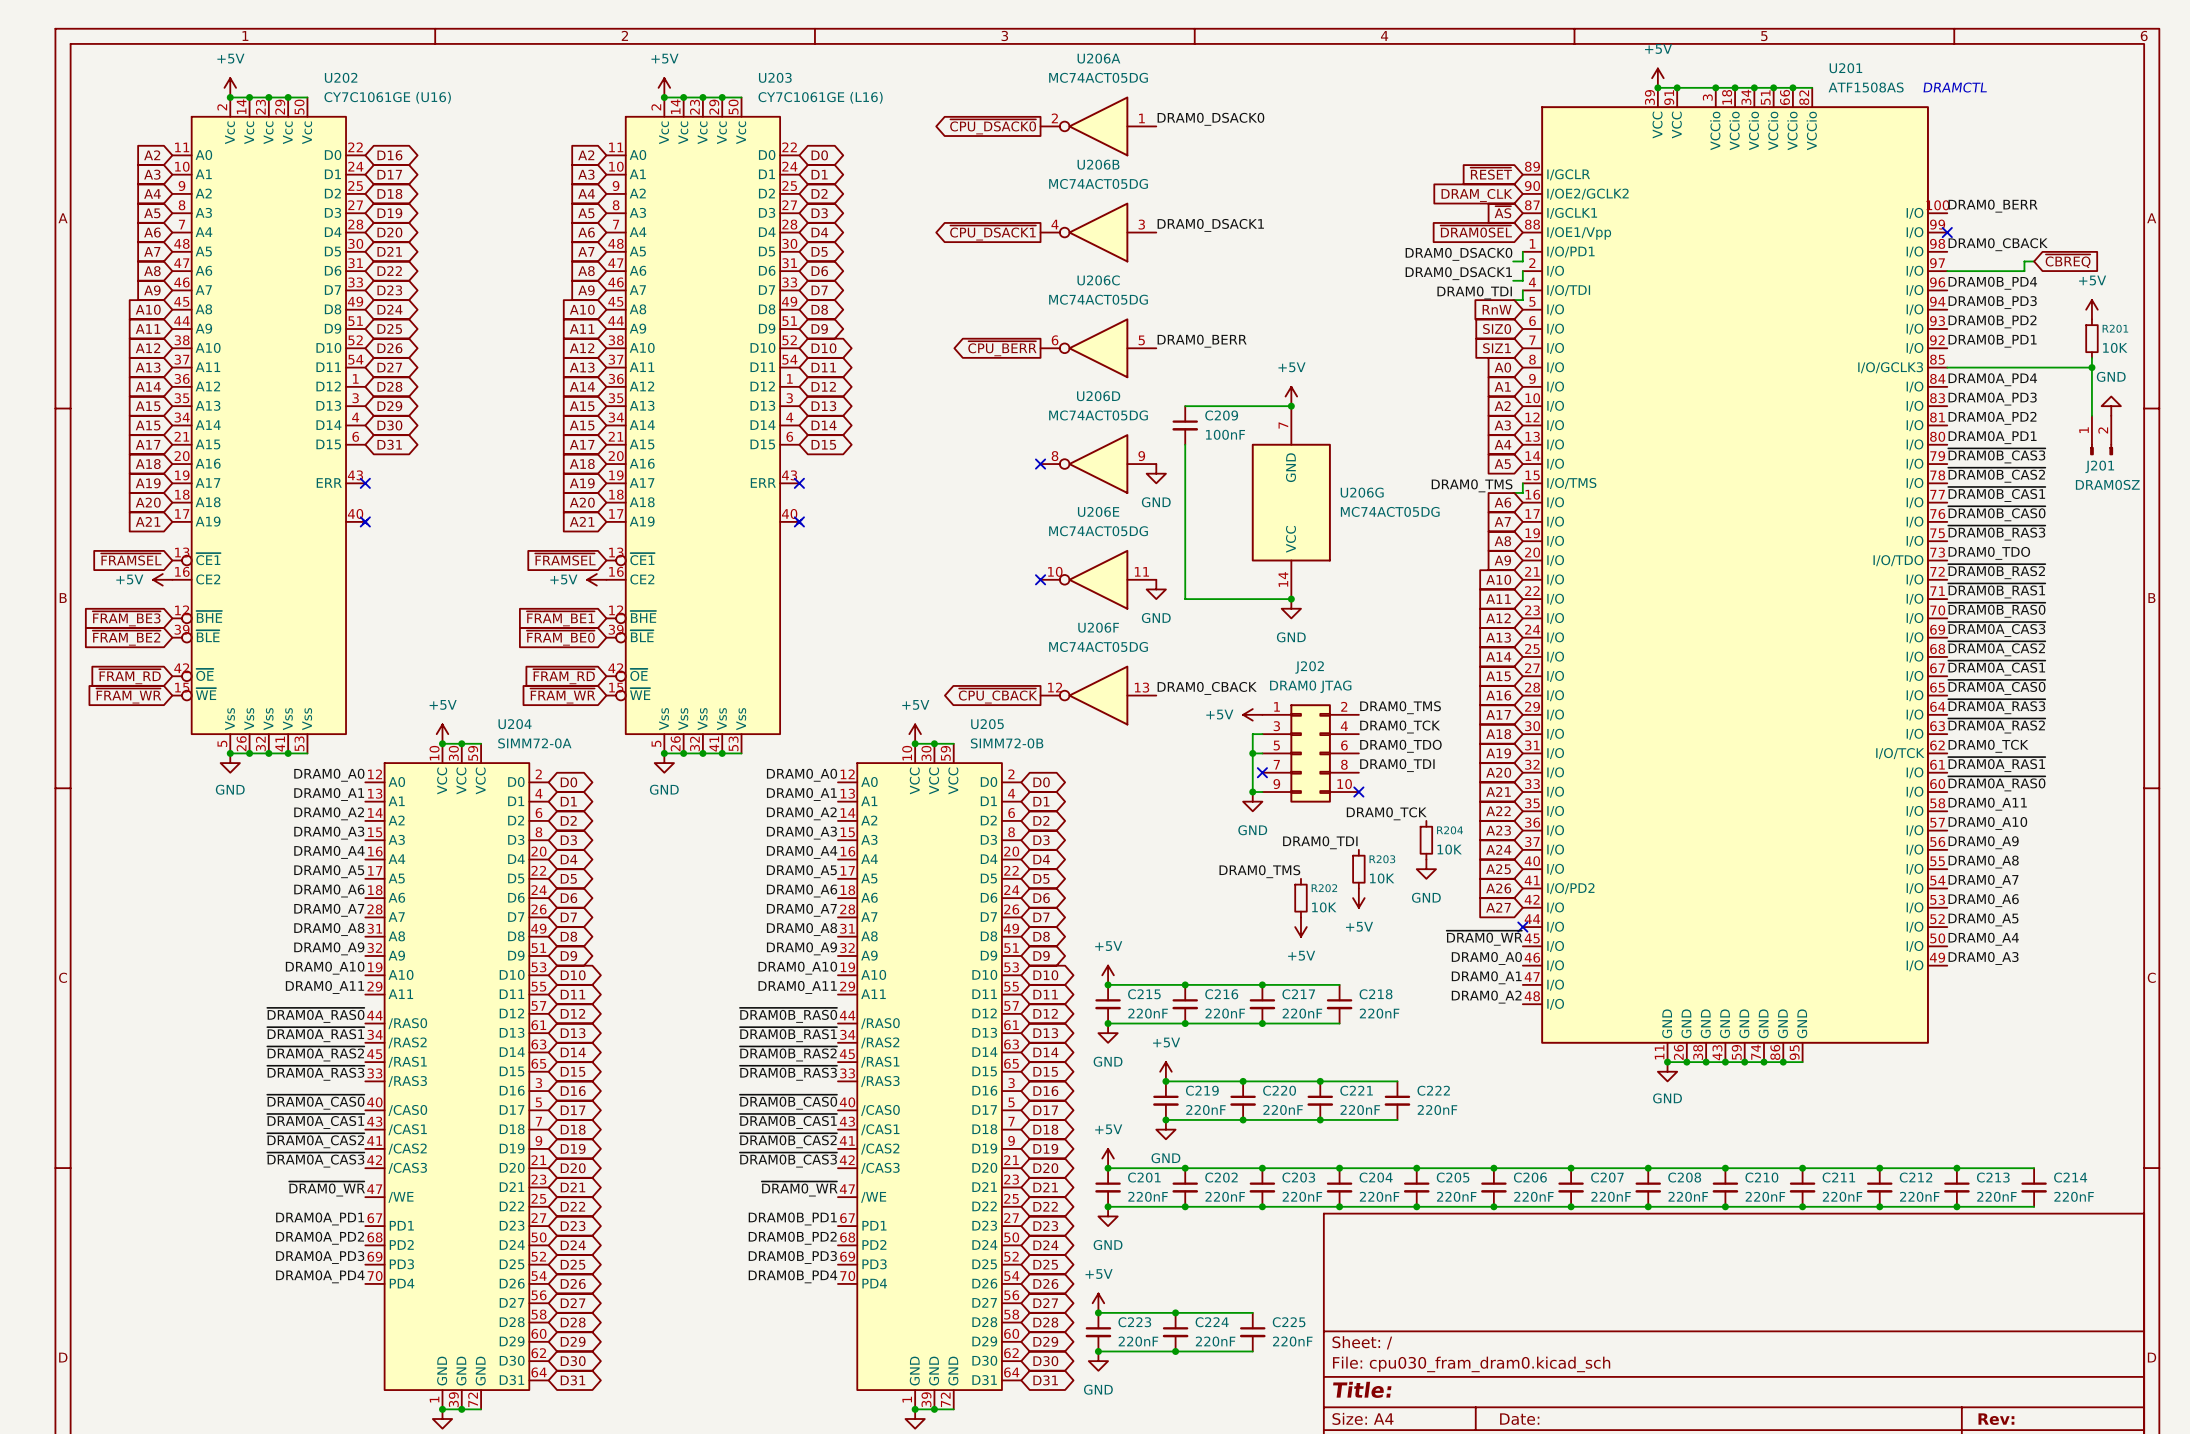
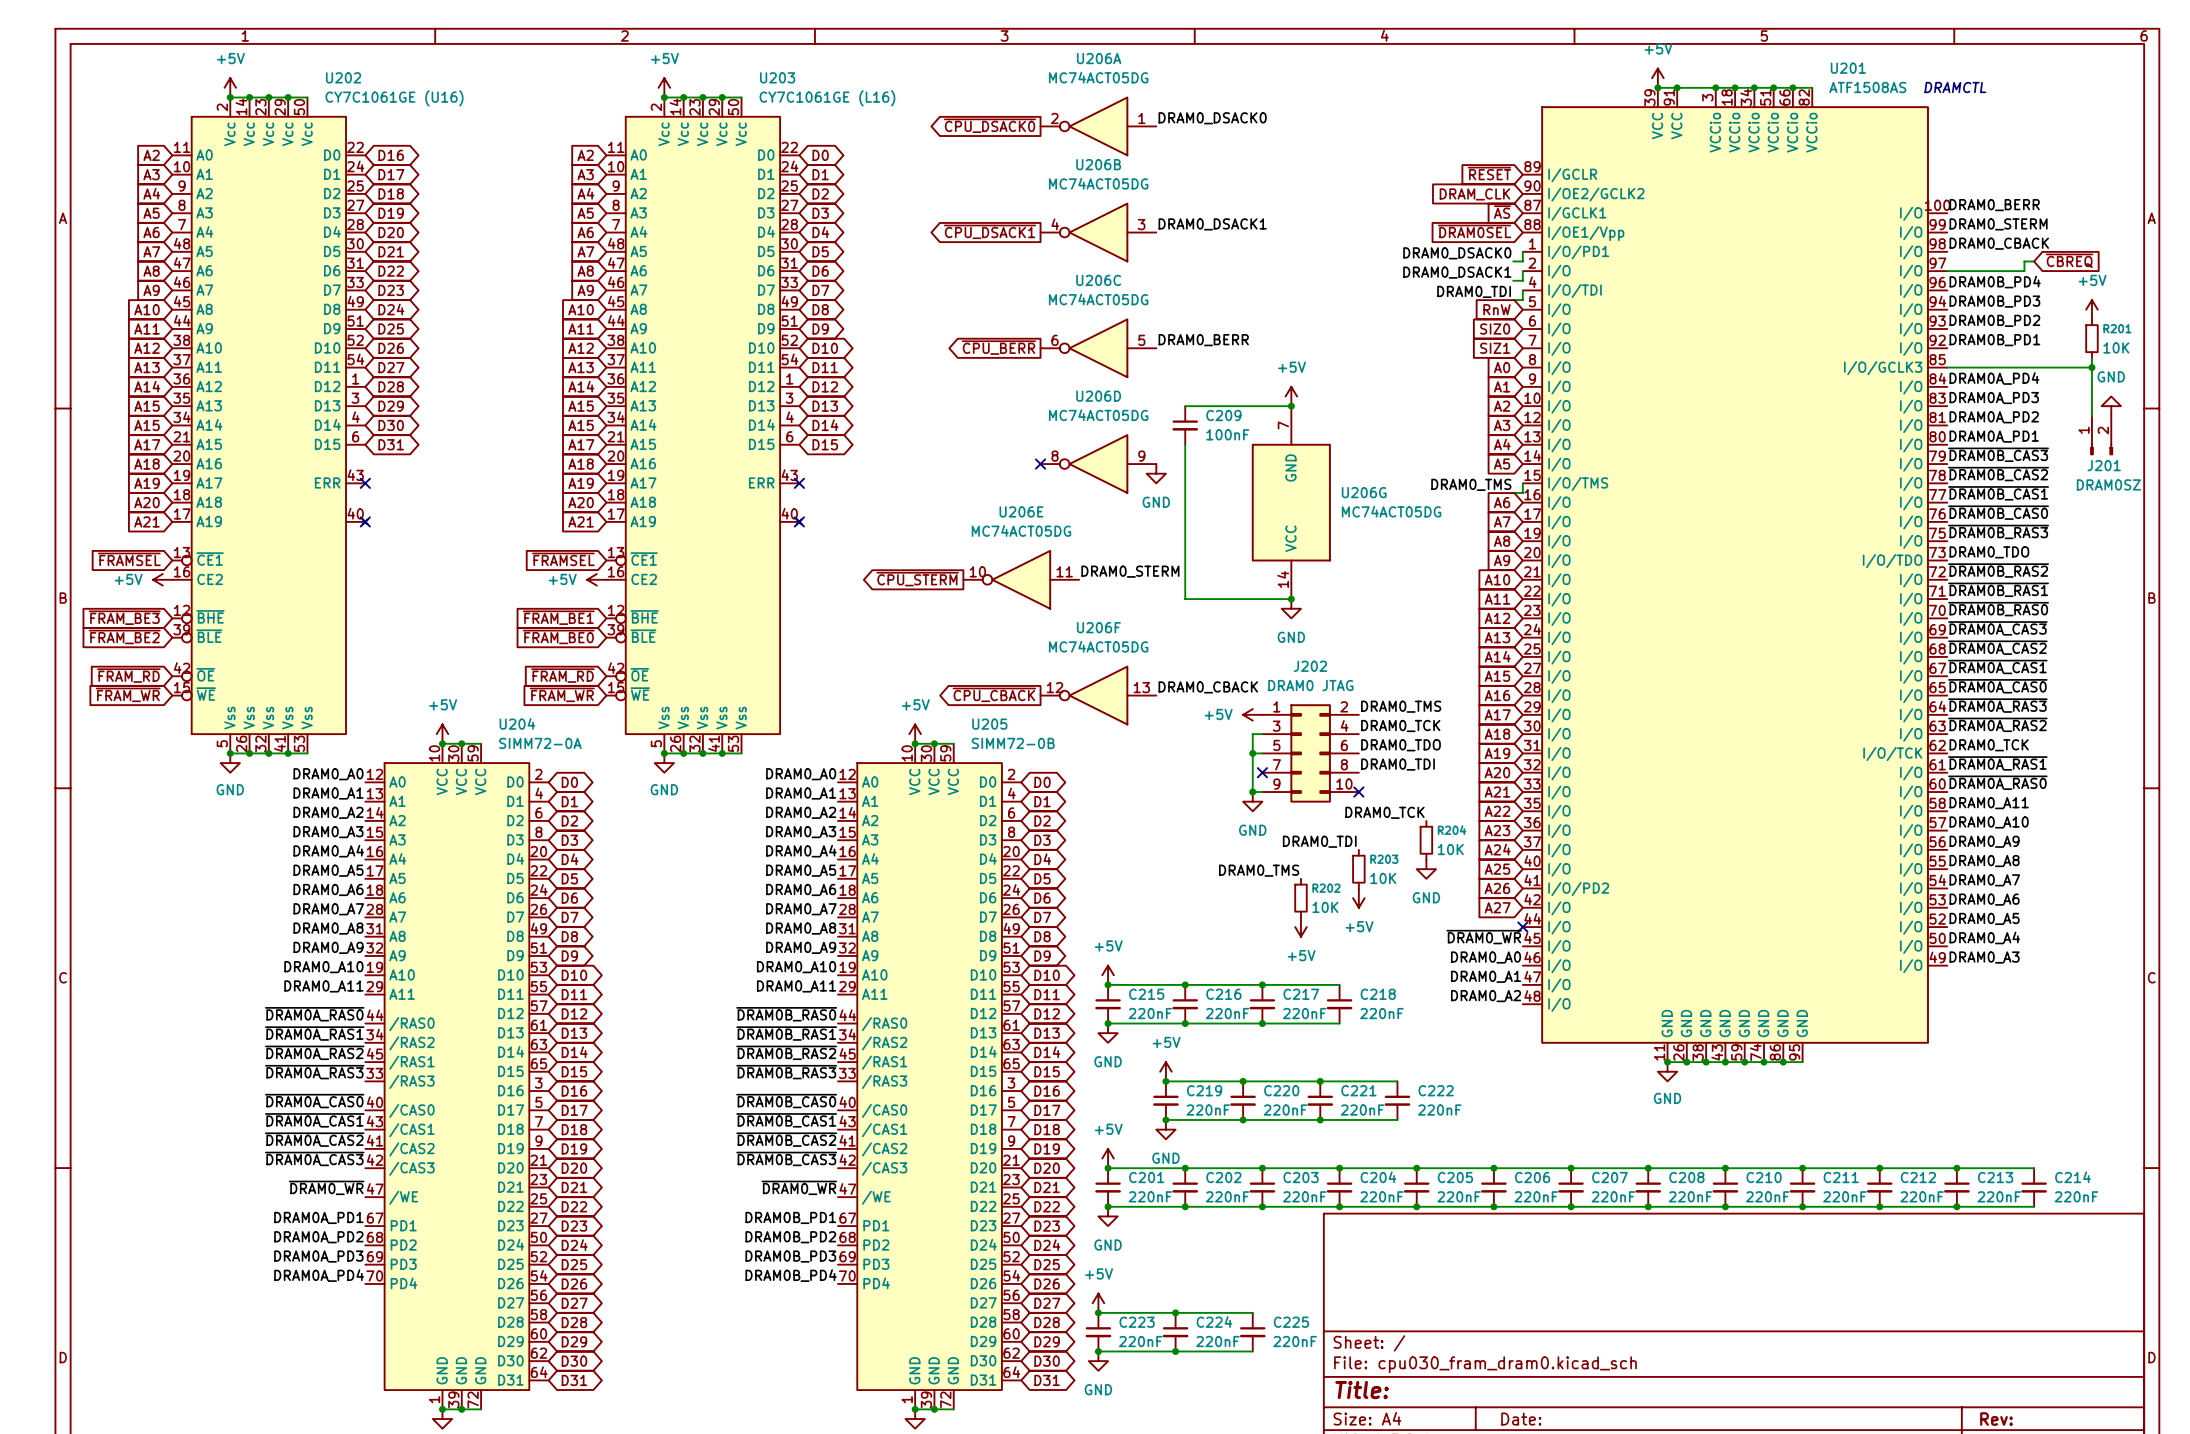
label: none -> DRAM0_STERM (1998, 224)
no-connect mark: (1947, 232) -> none
label: none -> DRAM0_STERM (1130, 571)
no-connect mark: (1040, 579) -> none
U206E position: (1098, 579) -> (1021, 579)
global label: none -> ~{CPU_STERM} (917, 579)
power symbol: GND (1156, 589) -> none

